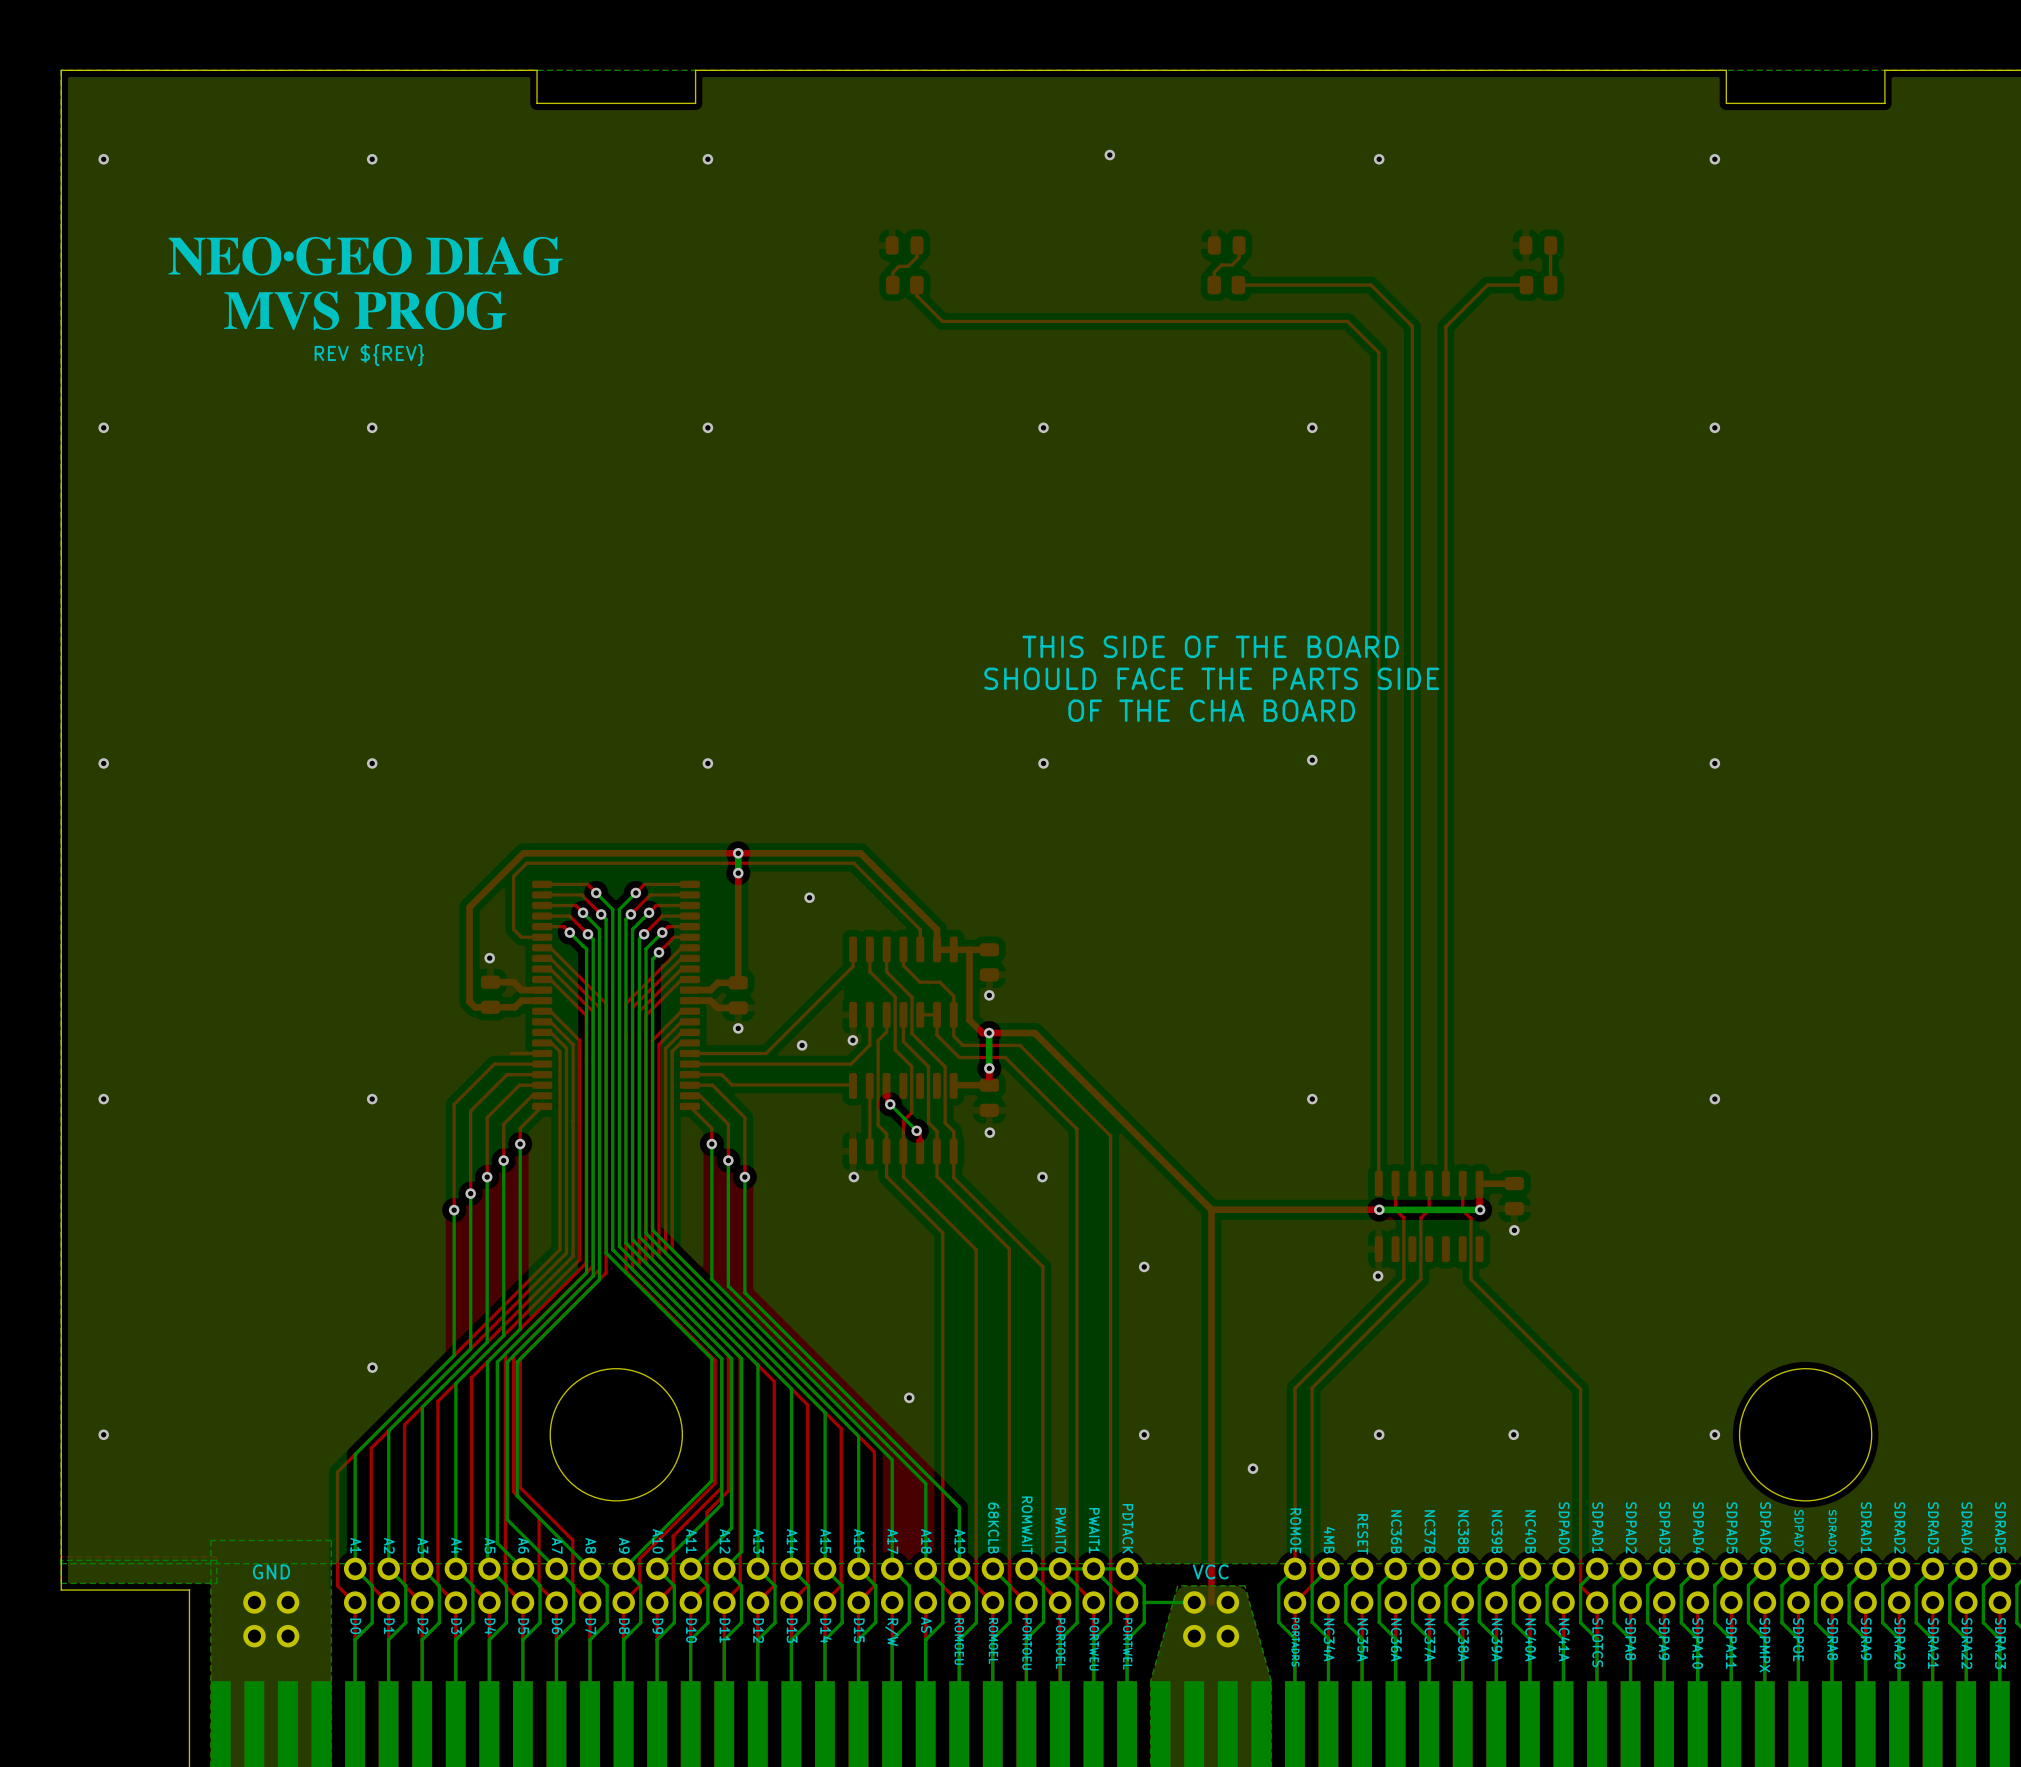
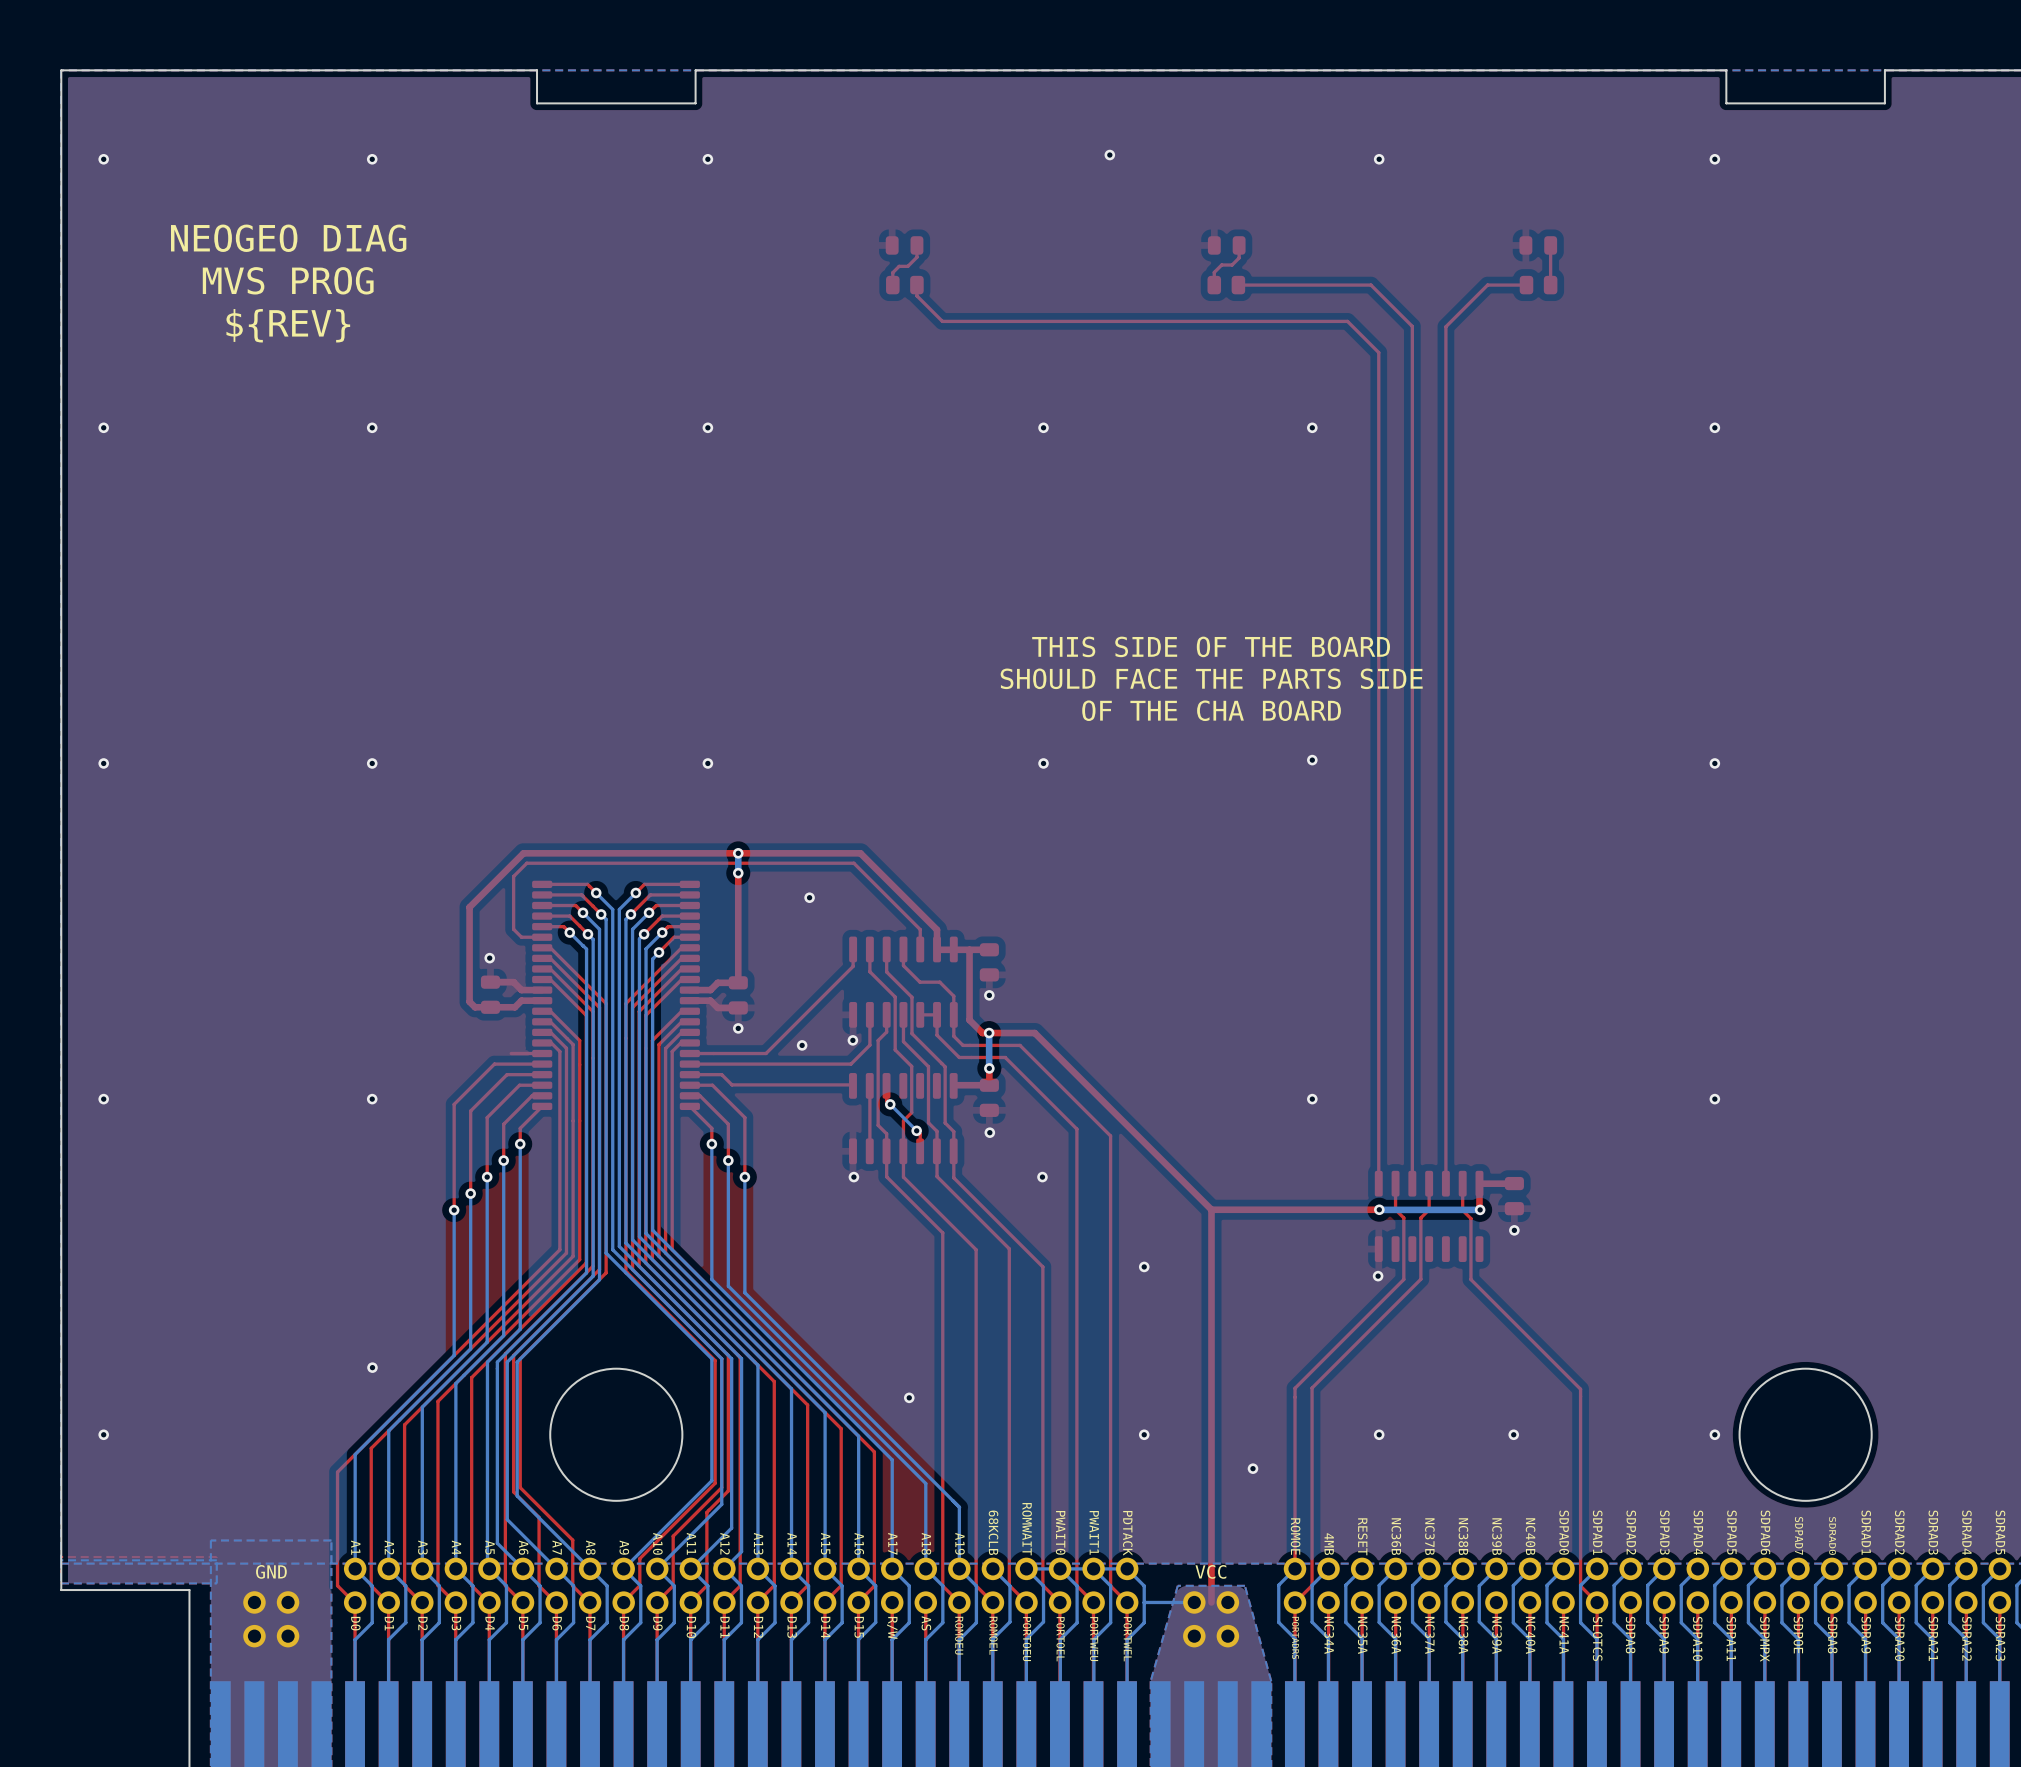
drawing: [168, 236, 563, 331] -> none
text: none -> NEOGEO DIAG (288, 238)
text: none -> MVS PROG (288, 280)
text: REV ${REV} (369, 355) -> ${REV} (288, 325)

